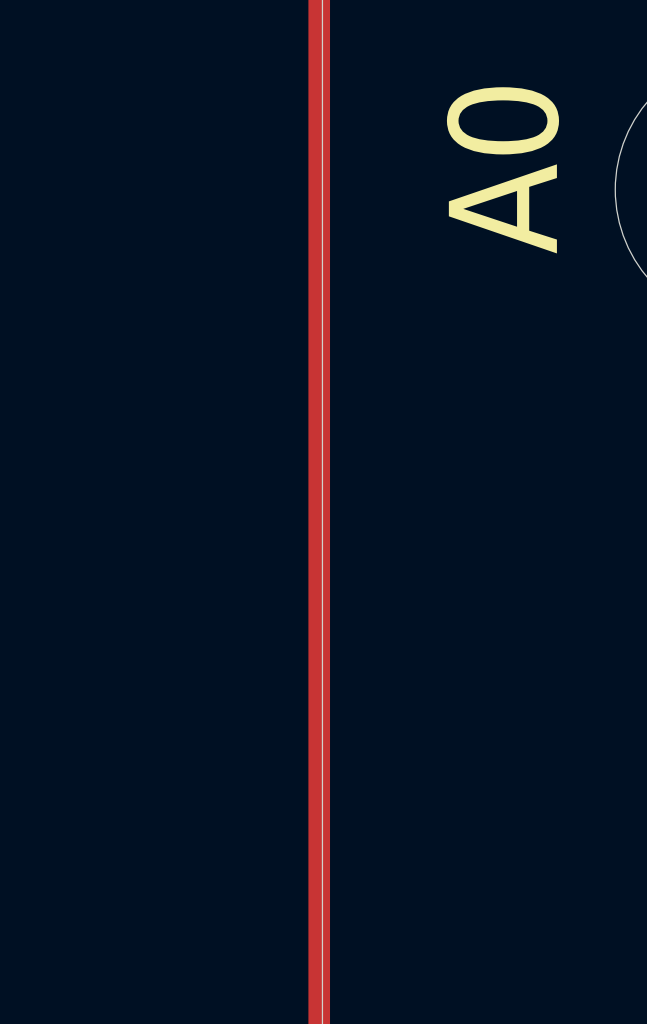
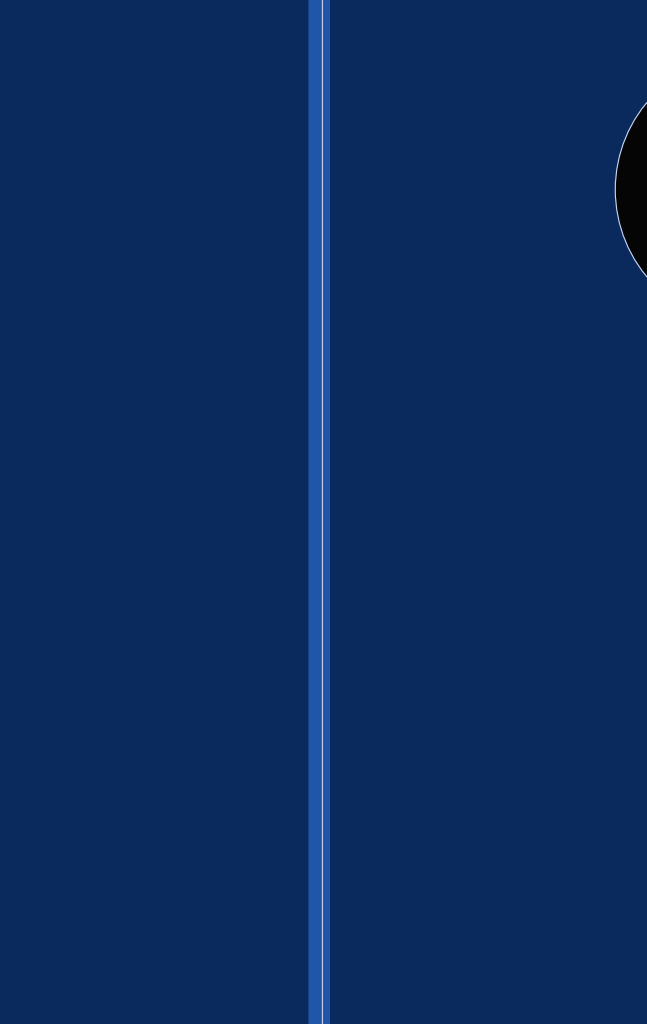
text: A0 (502, 170) -> none

